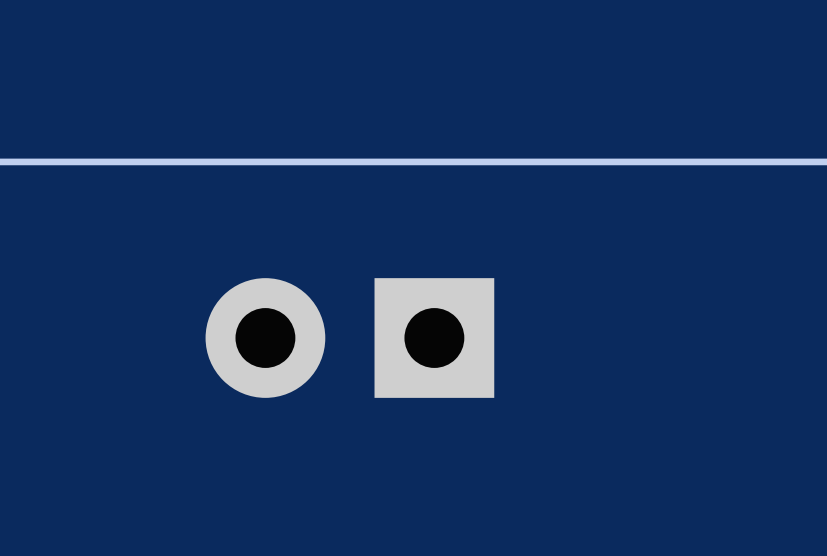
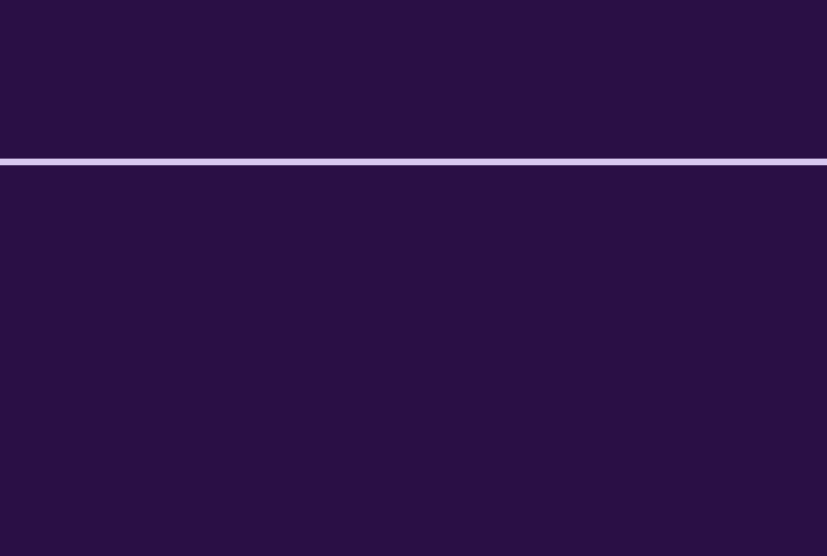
part: (349, 338) -> none

